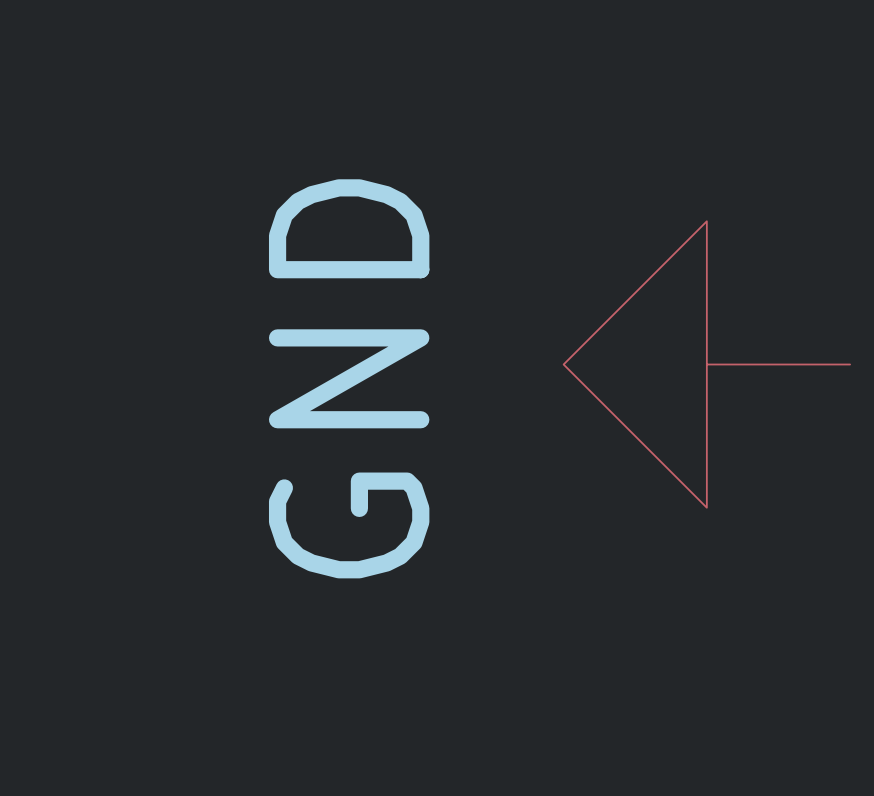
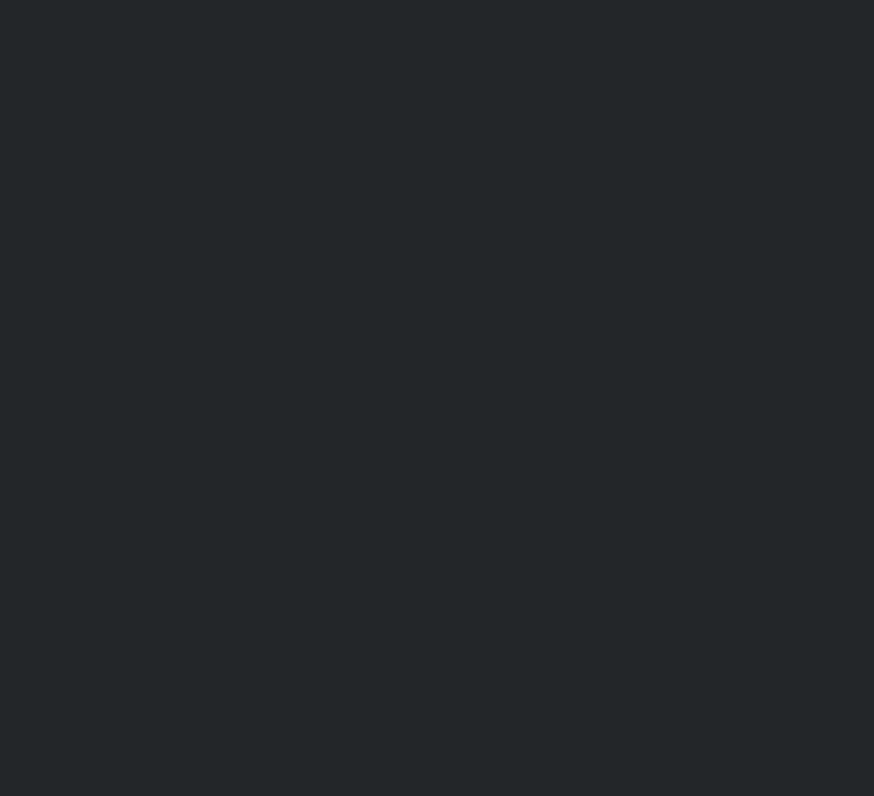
power symbol: GND (706, 364) -> none

